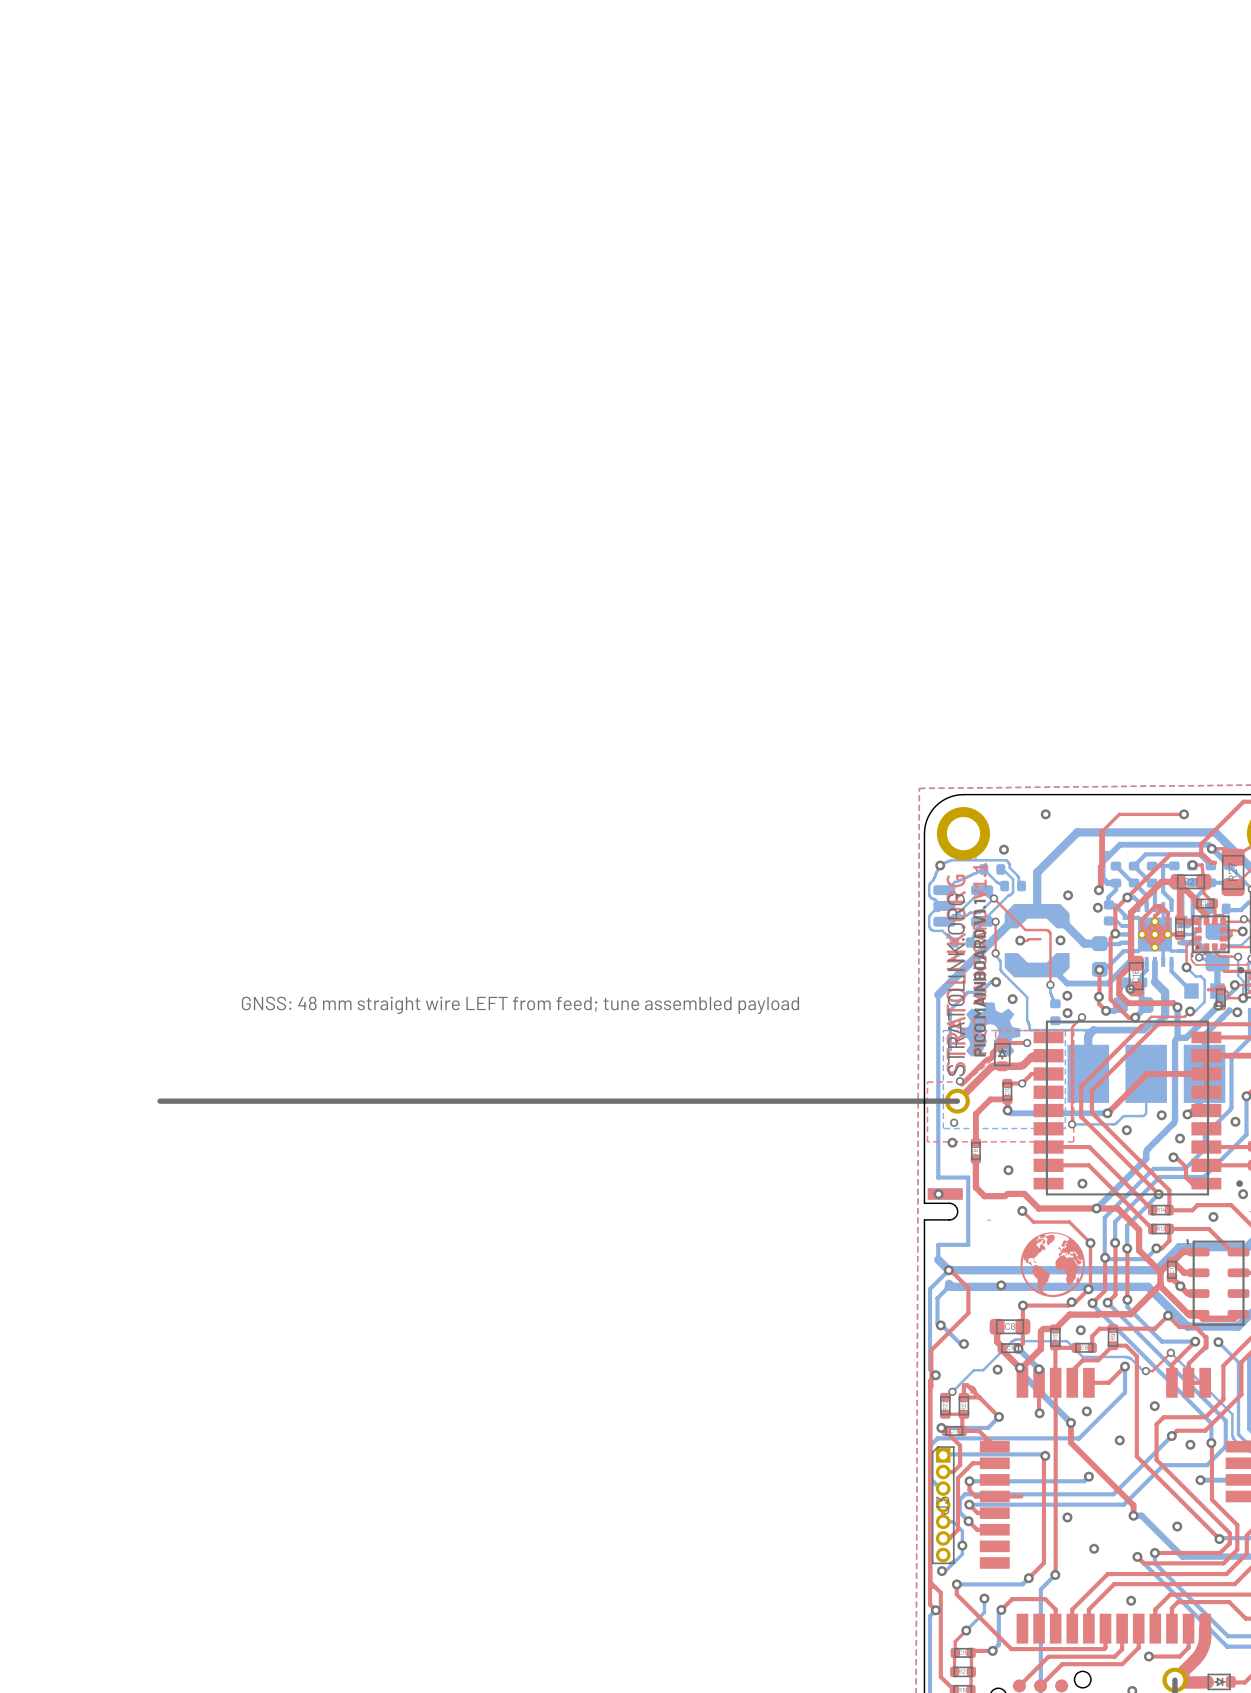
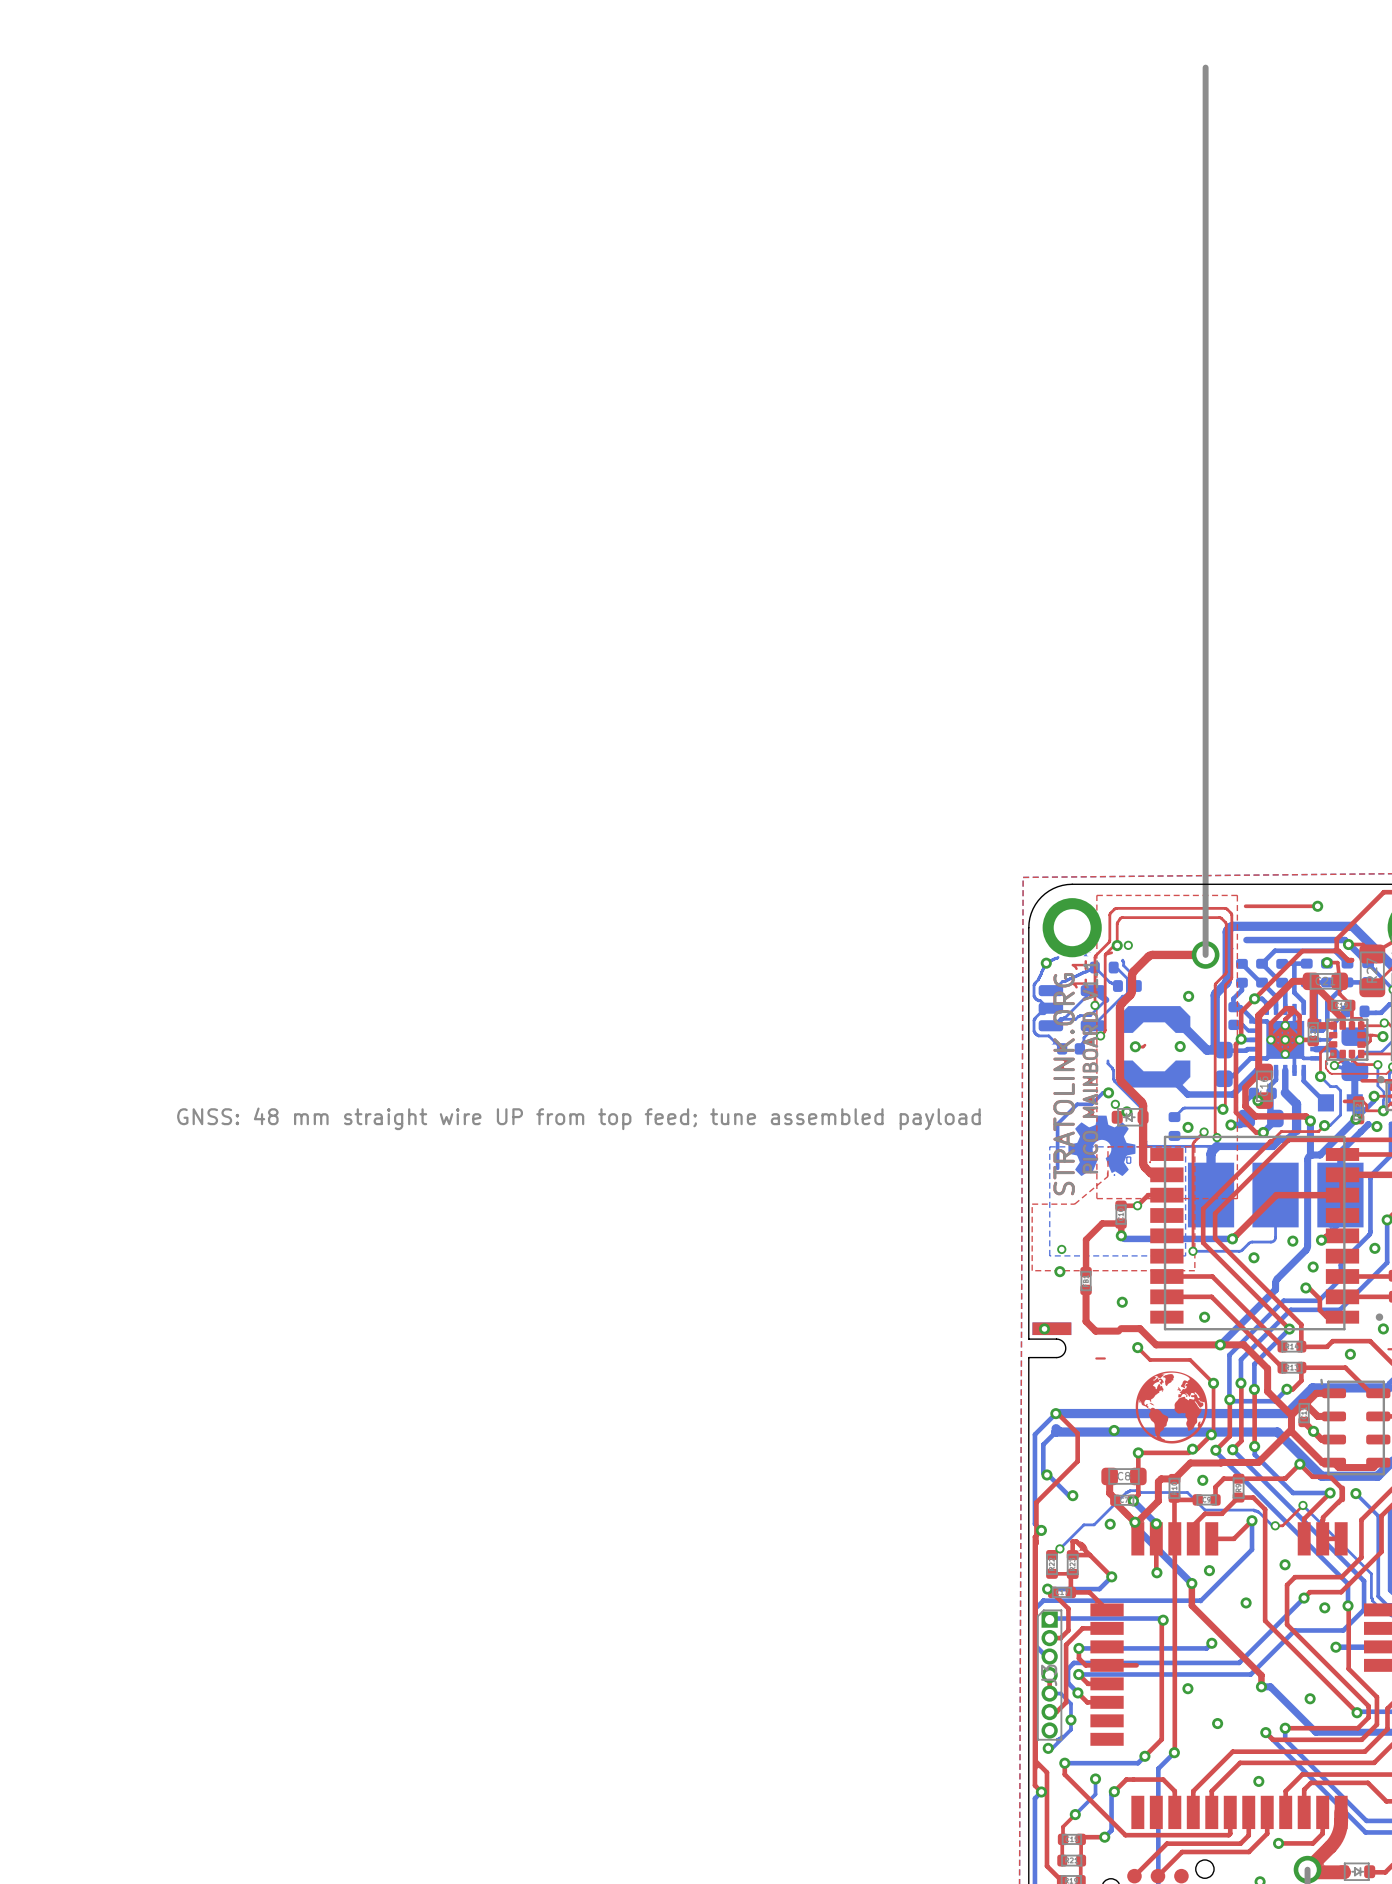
part: none -> (1205, 516)
top zone outline: none -> (1096, 895) (1237, 895) (1237, 1198) (1096, 1198) (1096, 895)
via: (1045, 814) -> none
top track: (1119, 814) (1102, 831) (1102, 865) (1100, 888) (1098, 890) -> none
bottom track: (1107, 832) (1077, 832) (1037, 872) (1037, 911) -> (1232, 926) (1227, 931) (1227, 981) (1215, 995) (1215, 1047) (1217, 1050)
bottom track: (1120, 844) (1102, 862) (1102, 878) (1107, 883) (1116, 883) -> none
via: none -> (1128, 945)
bottom track: (1104, 852) (1108, 852) -> none
top track: none -> (1111, 952) (1105, 954)
bottom track: (950, 860) (1006, 860) (1008, 862) -> none
drawing shape: [972, 862, 987, 872] -> [1071, 960, 1087, 970]
drawing shape: [972, 879, 987, 889] -> [1071, 978, 1087, 989]
via: (1098, 890) -> none
top track: (993, 898) (1025, 930) (1049, 931) (1050, 984) -> none
via: (993, 898) -> none
top track: none -> (1095, 1005) (1095, 956) (1109, 941) (1109, 914) (1114, 908) (1226, 908) (1231, 914) (1231, 977) (1225, 986) (1225, 1108)
via: none -> (1095, 1005)
via: (1097, 907) -> none
bottom track: (1037, 911) (1021, 911) (938, 994) (938, 1177) (968, 1177) (968, 1244) (938, 1244) (938, 1259) (948, 1270) -> none
drawing: [958, 912, 992, 930] -> none
top track: (995, 921) (995, 953) -> none
via: (995, 921) -> none
top track: none -> (1100, 1035) (1105, 1030) (1105, 955) (1117, 942) (1117, 923) (1120, 918) (1221, 918) (1226, 923) (1226, 971) (1215, 985) (1215, 1132) (1217, 1137)
via: none -> (1100, 1035)
top track: (1028, 939) (1040, 939) -> none
via: (995, 953) -> none
top track: (1099, 969) (1098, 1003) (1106, 1010) -> none
via: (1099, 969) -> none
bottom track: (1050, 984) (1050, 993) (1055, 1003) -> (1225, 1108) (1184, 1108) (1174, 1117)
via: (1050, 984) -> none
via: none -> (1115, 1104)
via: (1067, 995) -> none
text: GNSS: 48 mm straight wire LEFT from feed; tune assembled payload (520, 1005) -> GNSS: 48 mm straight wire UP from top feed; tune assembled payload (578, 1118)
via: none -> (1217, 1137)
bottom zone outline: none -> (1126, 1157) (1126, 1163) (1130, 1163) (1130, 1157) (1126, 1157)
drawing: [957, 1040, 1005, 1087] -> none
top track: (1002, 1043) (1027, 1043) -> none
via: (1027, 1043) -> none
top zone outline: none -> (1149, 1161) (1150, 1161) (1150, 1162) (1149, 1162) (1149, 1161)
part rotation: 0° (1002, 1054) -> 90° counterclockwise (1130, 1117)
part position: (1002, 1054) -> (1130, 1117)
bottom zone outline: none -> (1113, 1174) (1114, 1174) (1114, 1175) (1113, 1175) (1113, 1174)
top track: (1037, 1055) (1031, 1056) (1020, 1066) (991, 1066) (957, 1101) -> (1155, 1174) (1150, 1172) (1143, 1163) (1142, 1103) (1120, 1078) (1120, 1006) (1131, 993) (1132, 972) (1149, 956) (1205, 954)
drawing: [1028, 1059, 1034, 1066] -> none
via: (959, 1081) -> none
part: (563, 1101) -> none

